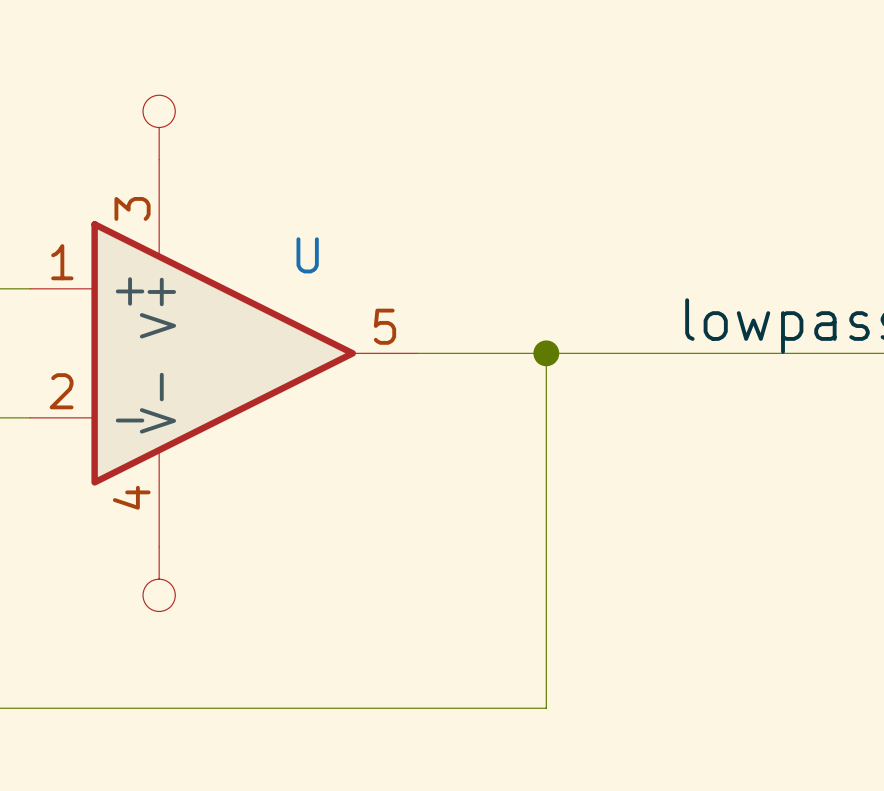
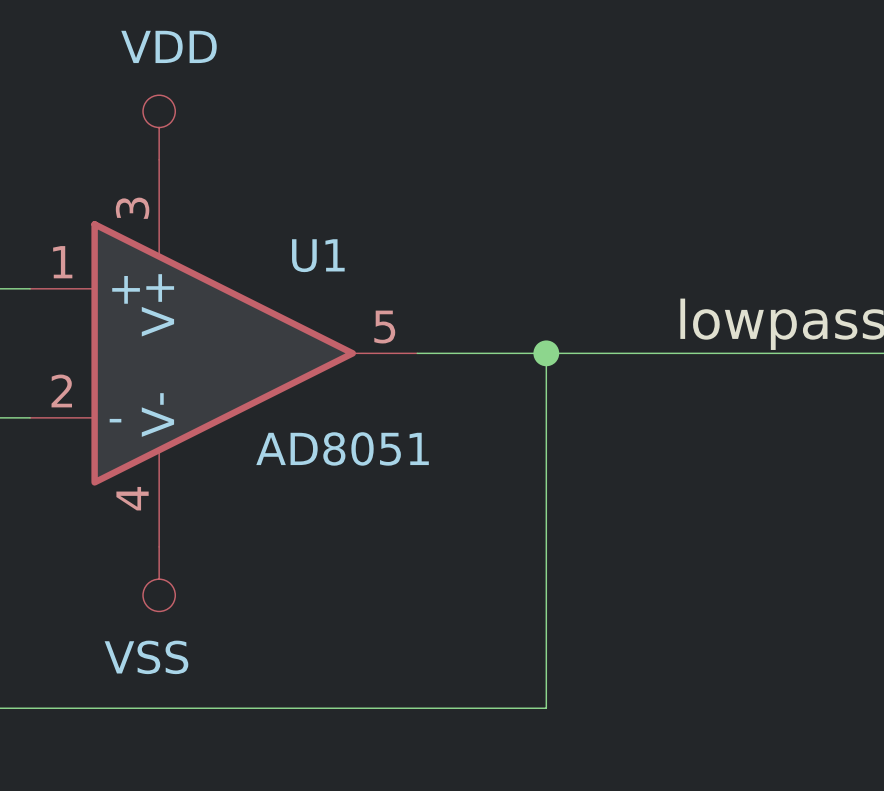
power symbol text: none -> VDD (168, 46)
U name: U (307, 255) -> U1 (318, 255)
U value: none -> AD8051 (342, 448)
power symbol text: none -> VSS (146, 657)

